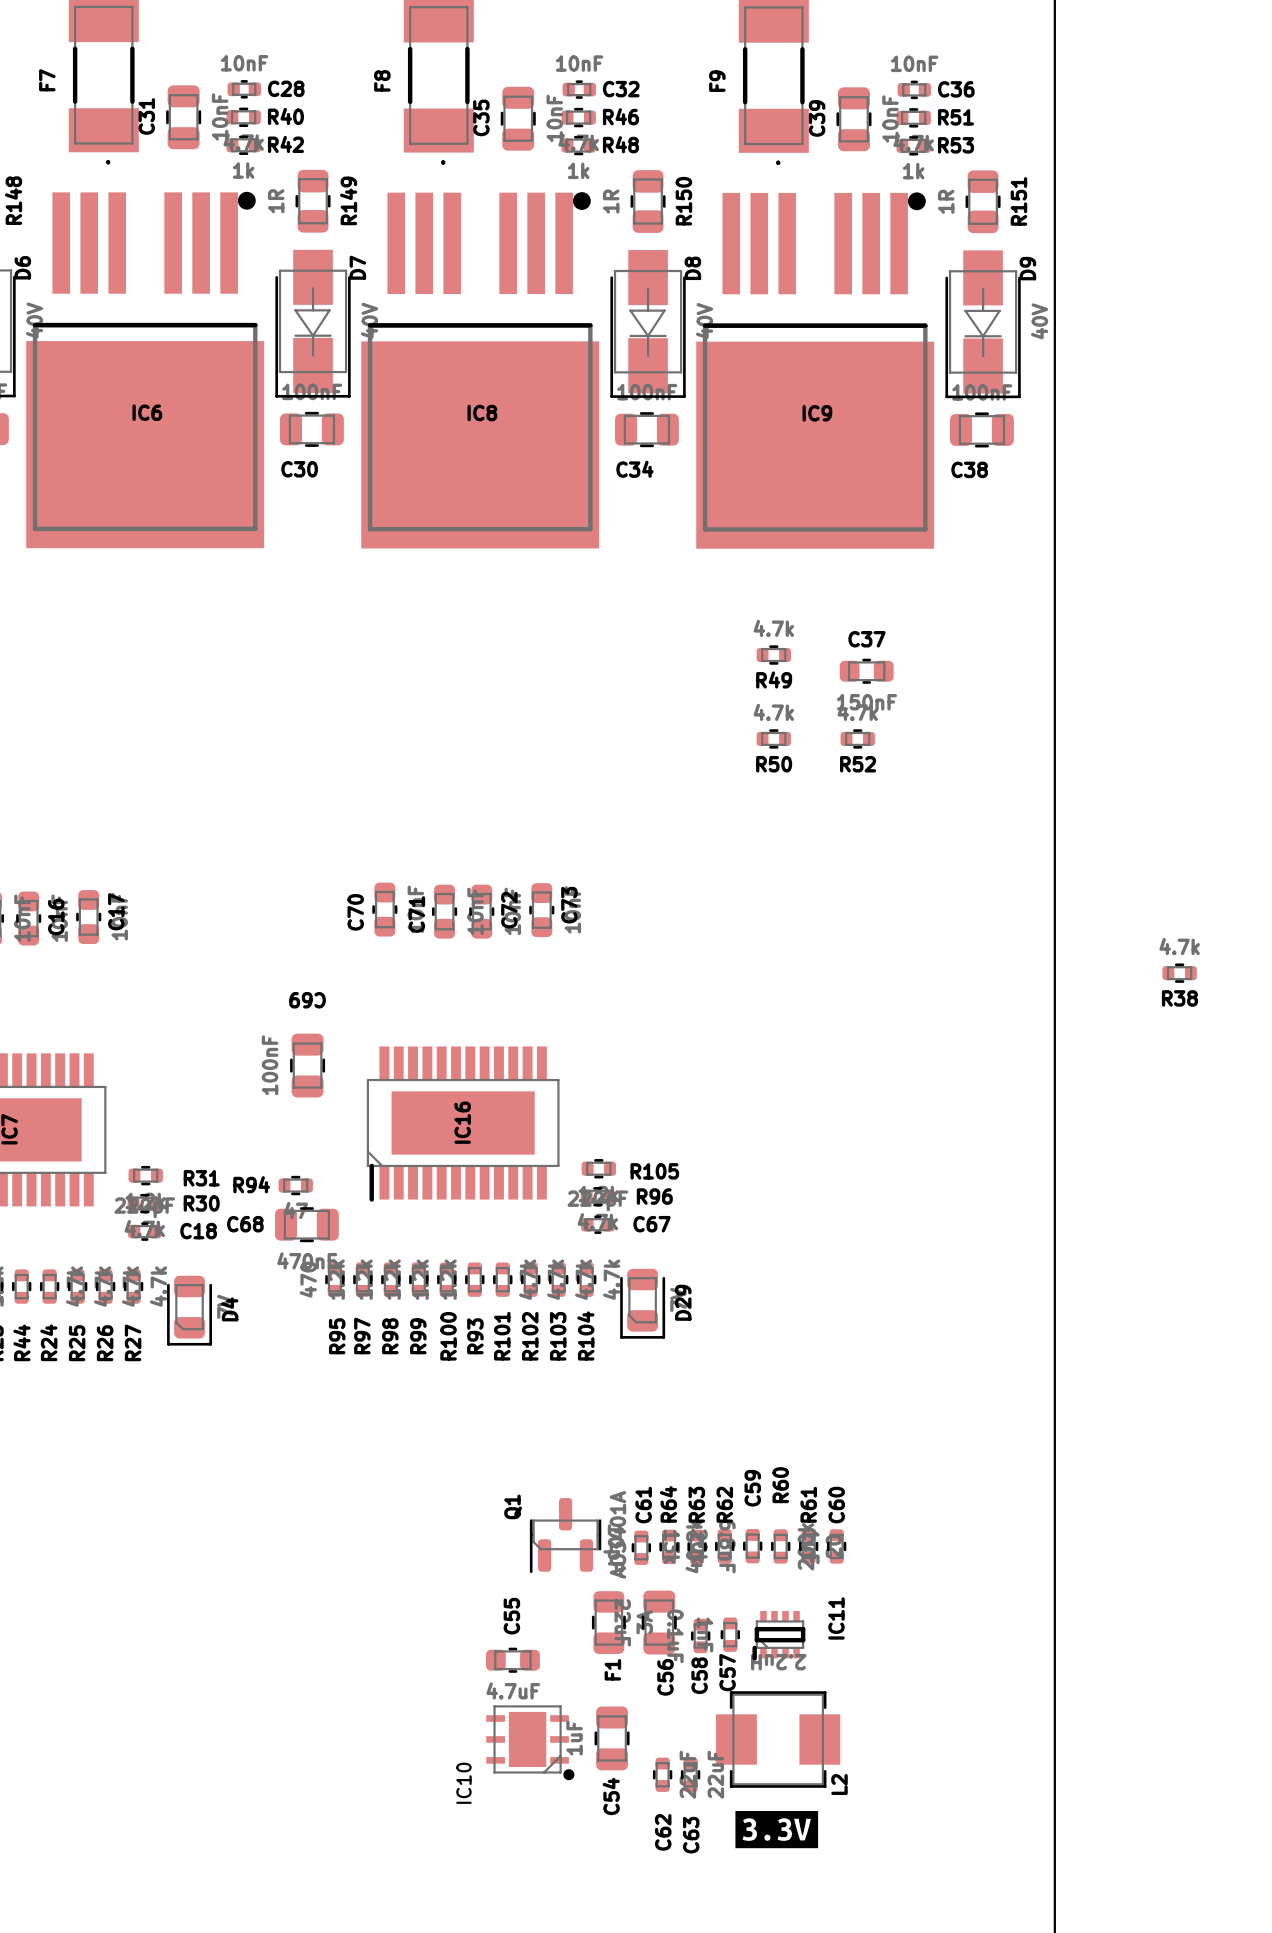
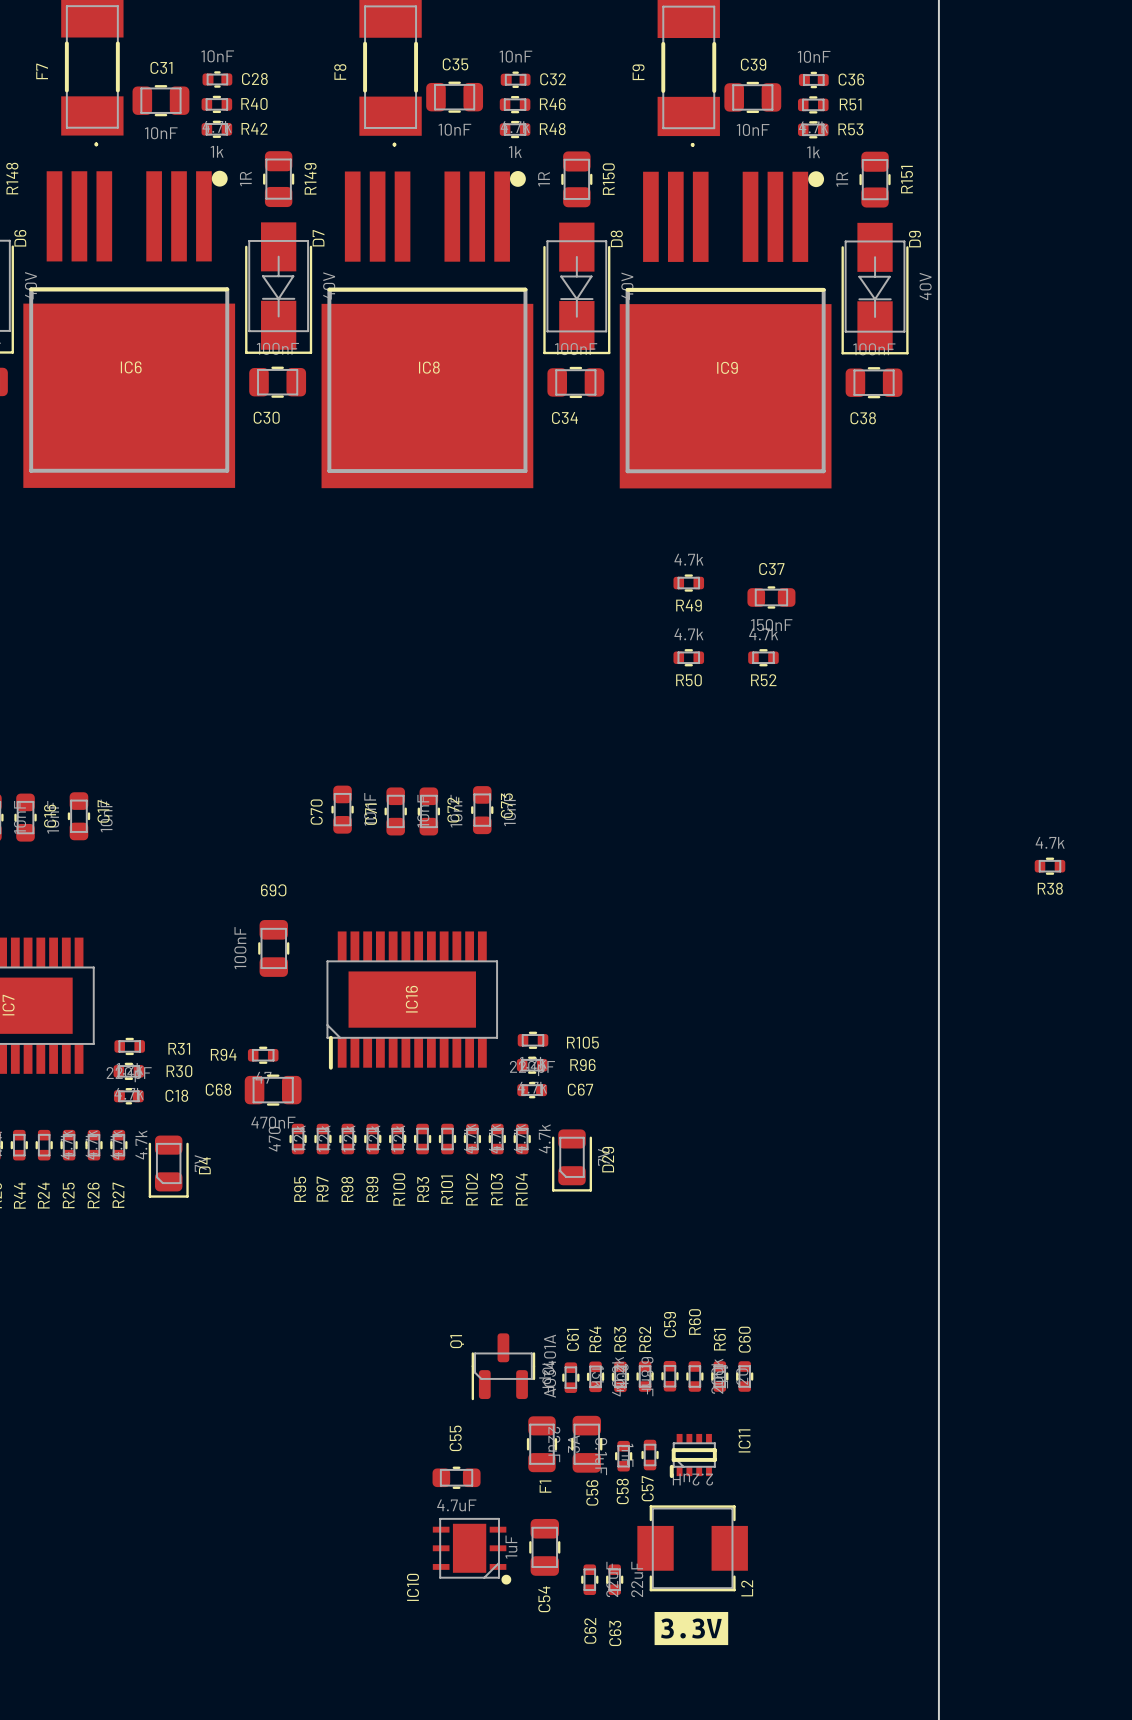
C31 rotation: 0° (183, 117) -> 90° clockwise (160, 100)
C35 rotation: 0° (518, 118) -> 90° clockwise (454, 97)
C39 rotation: 0° (853, 119) -> 90° clockwise (752, 97)

